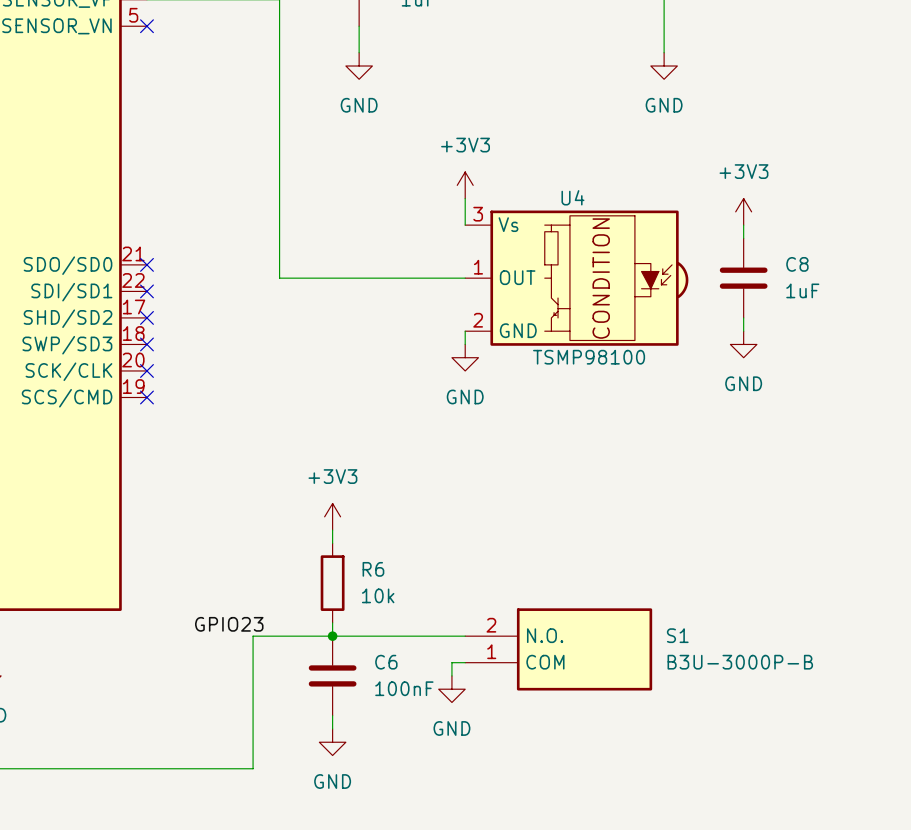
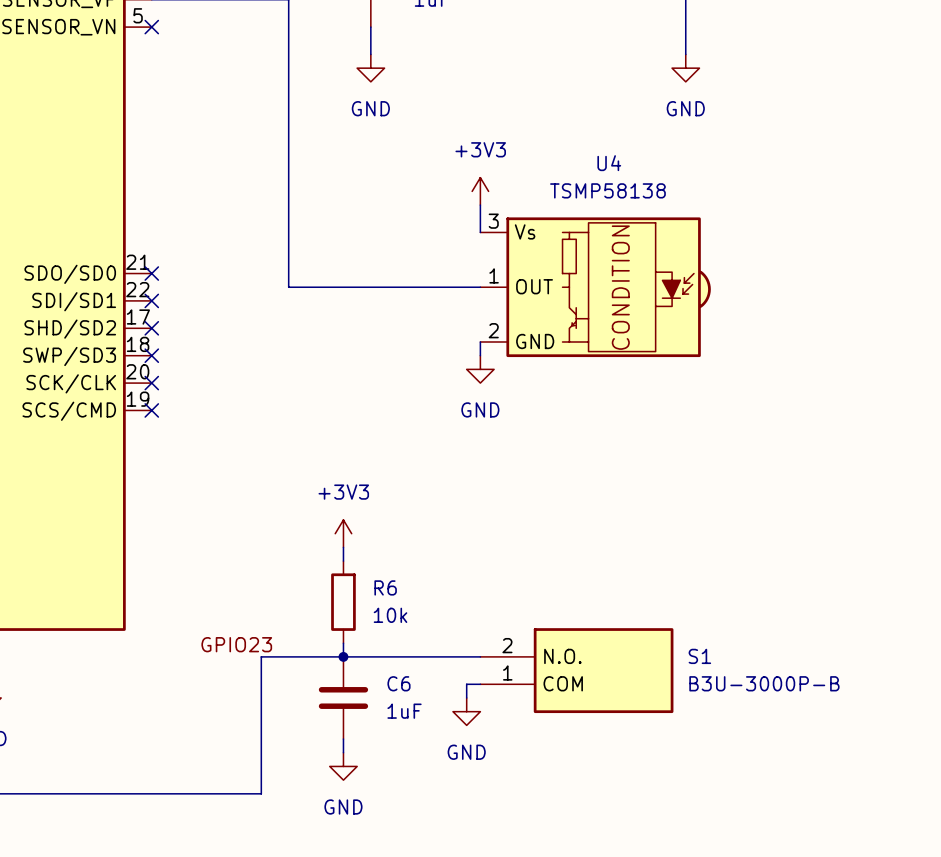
U4 name position: U4 (572, 197) -> U4 (609, 163)
power symbol: +3V3 (743, 211) -> none
wire: (743, 225) (743, 238) -> none
C8: 1uF (743, 278) -> none
wire: (743, 317) (743, 331) -> none
power symbol: GND (743, 344) -> none
U4 value: TSMP98100 (589, 357) -> TSMP58138 (607, 190)
C6 value: 100nF (404, 688) -> 1uF (404, 711)

